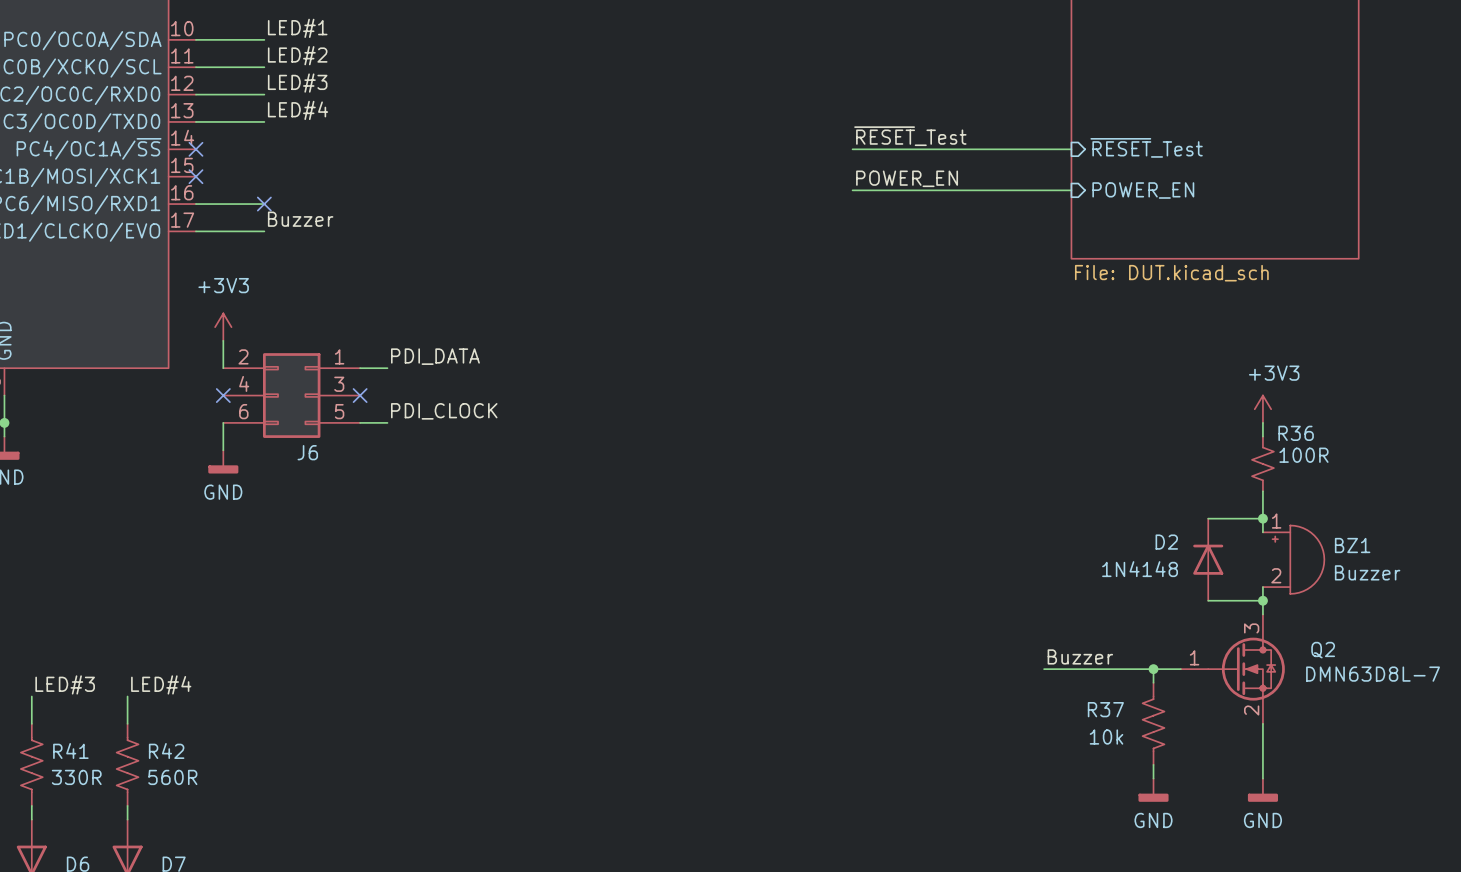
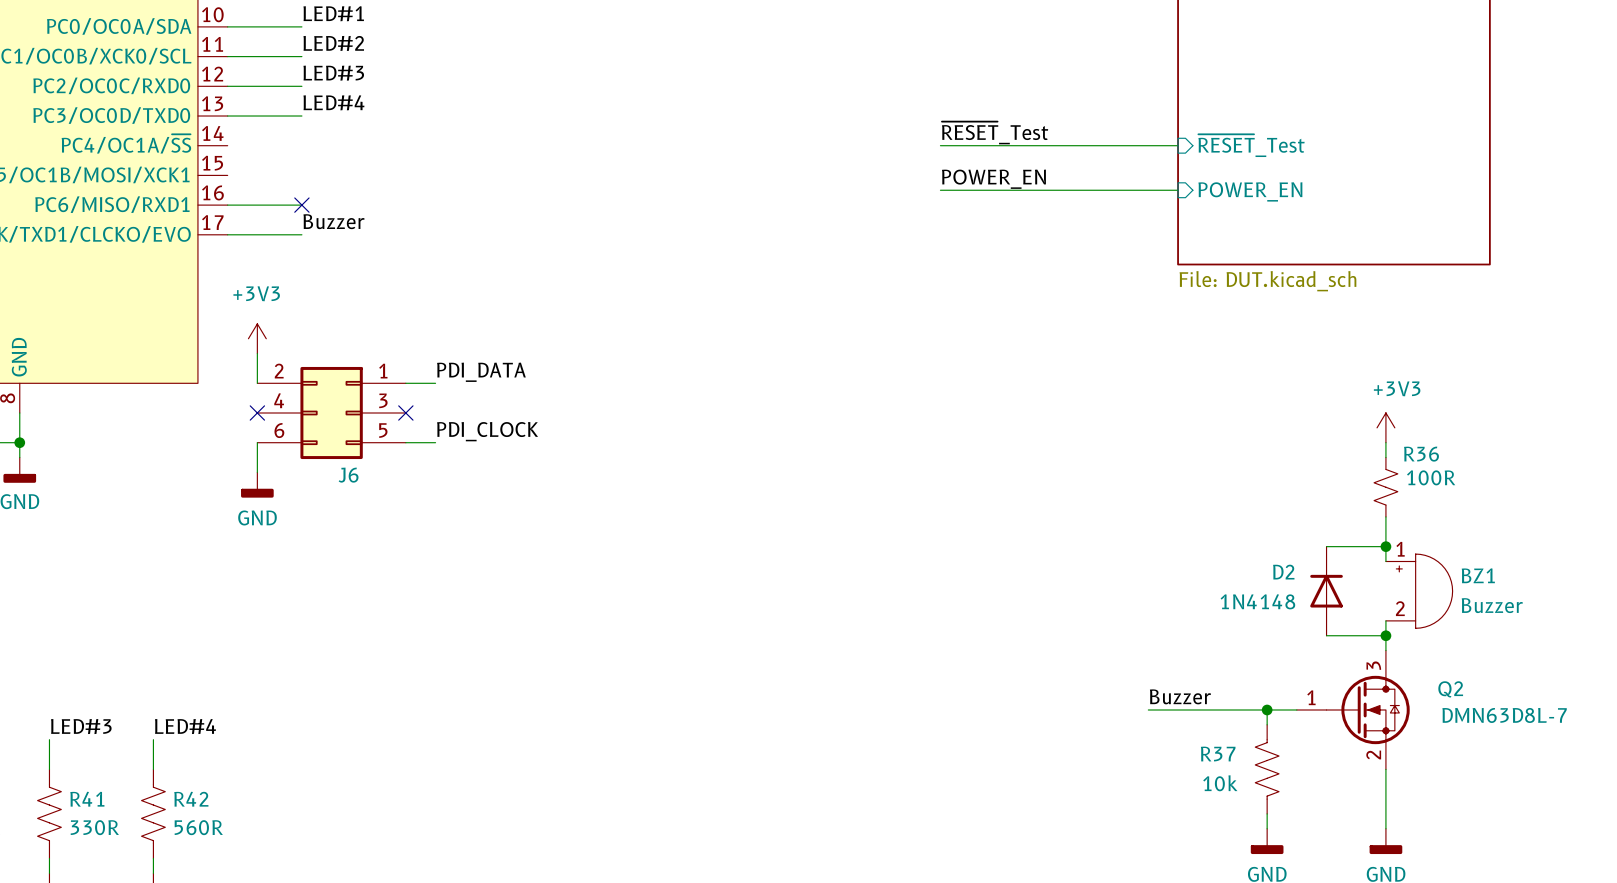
no-connect mark: (195, 149) -> none
no-connect mark: (195, 176) -> none

